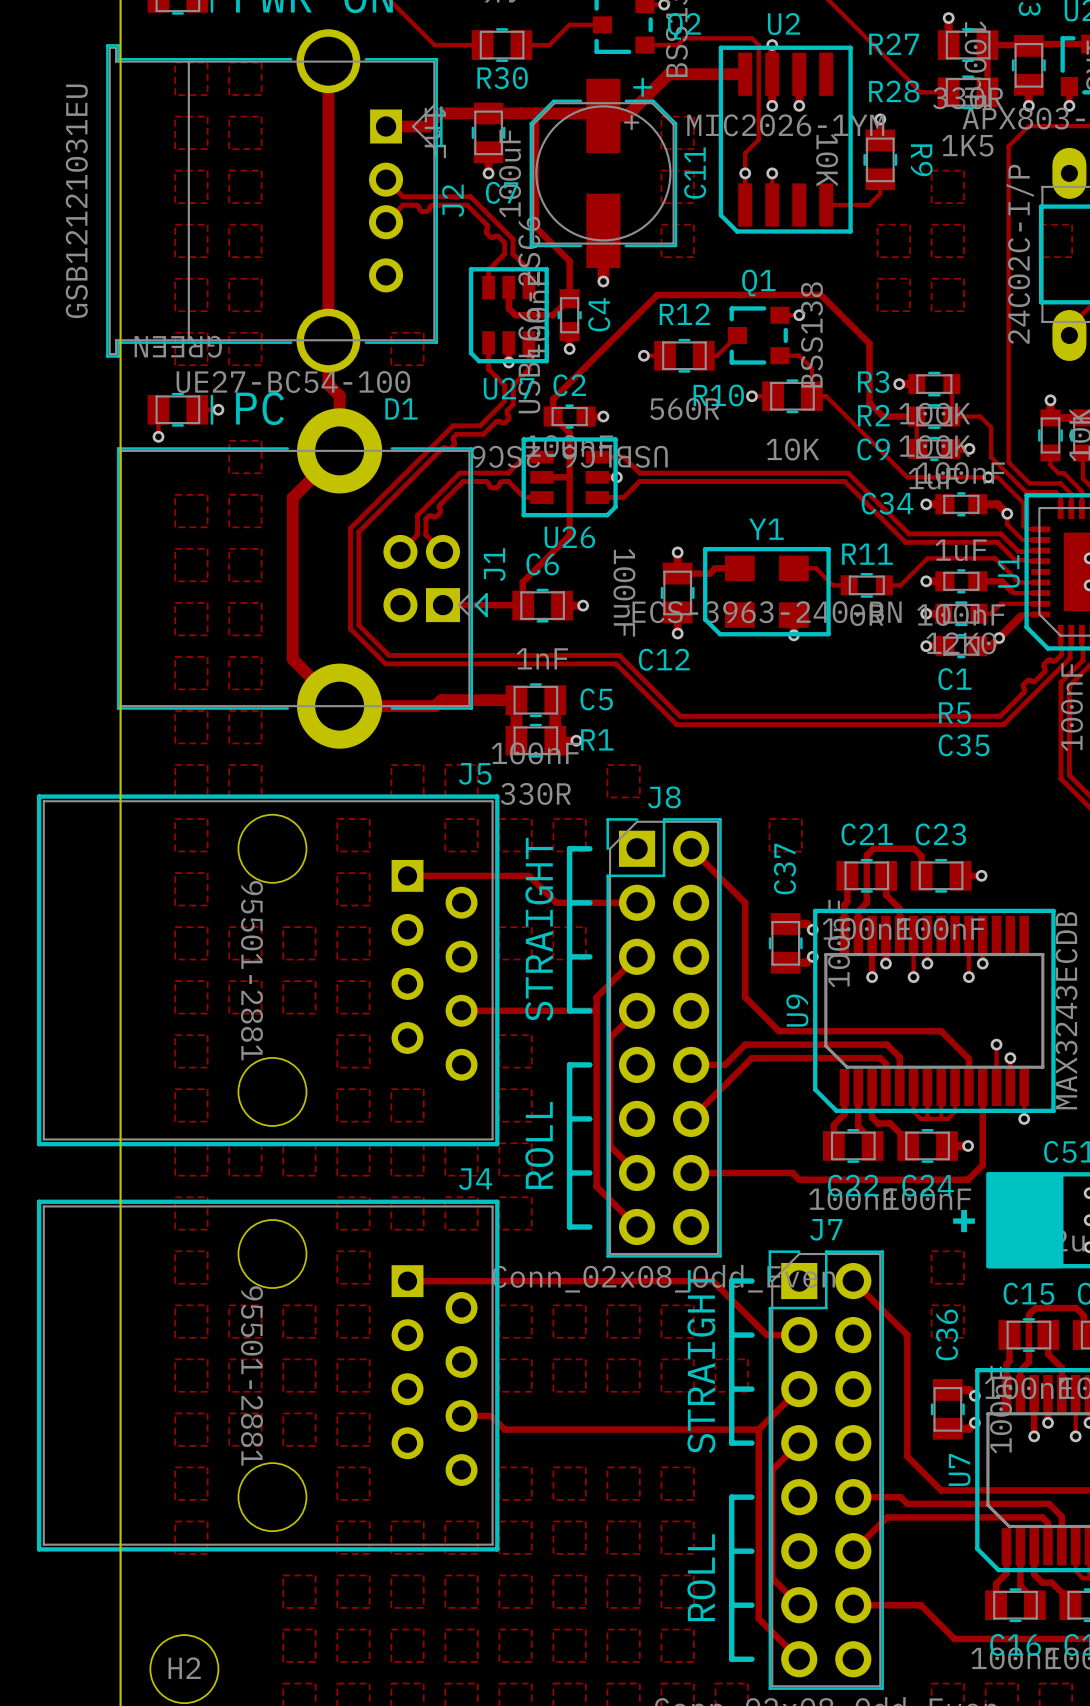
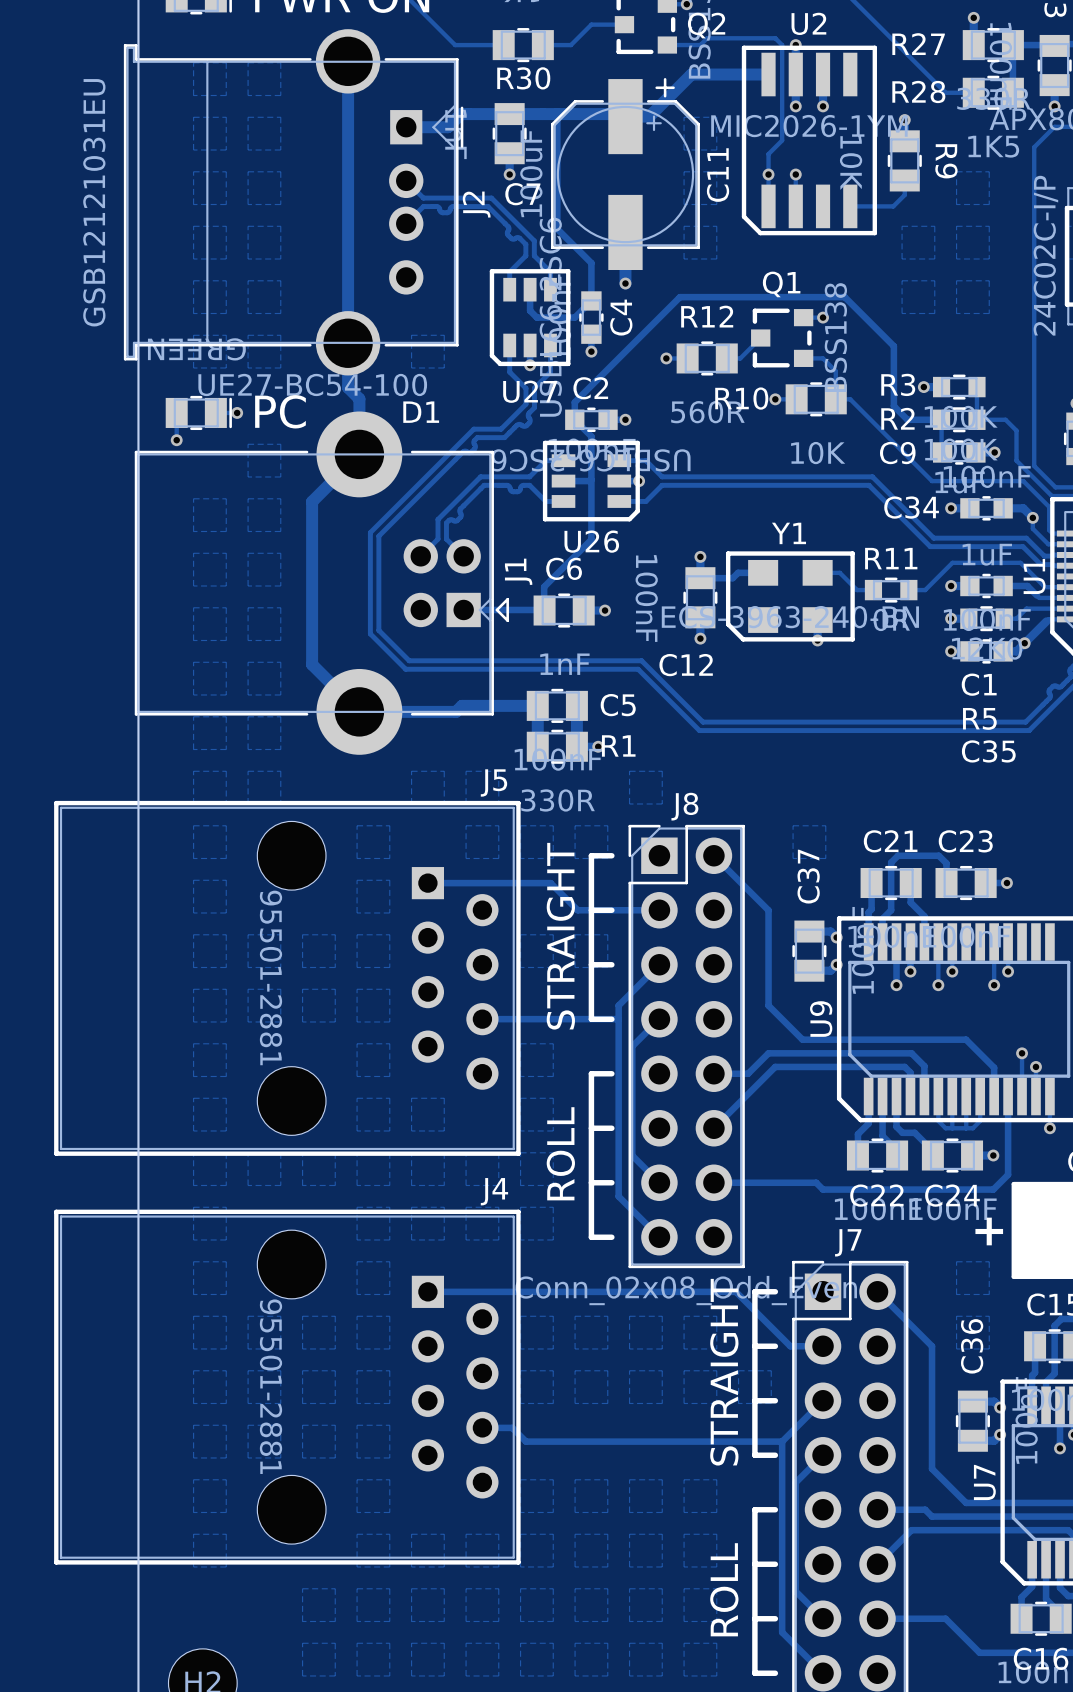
via: (988, 477) -> none

